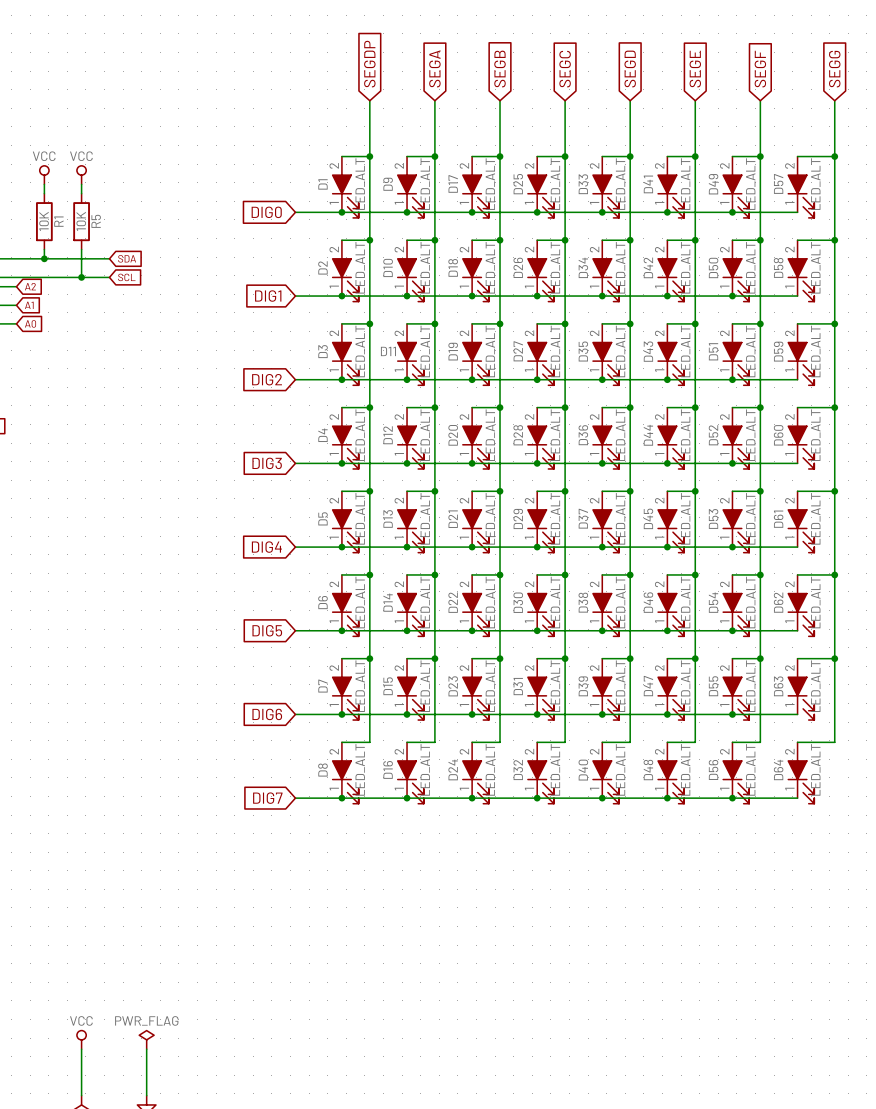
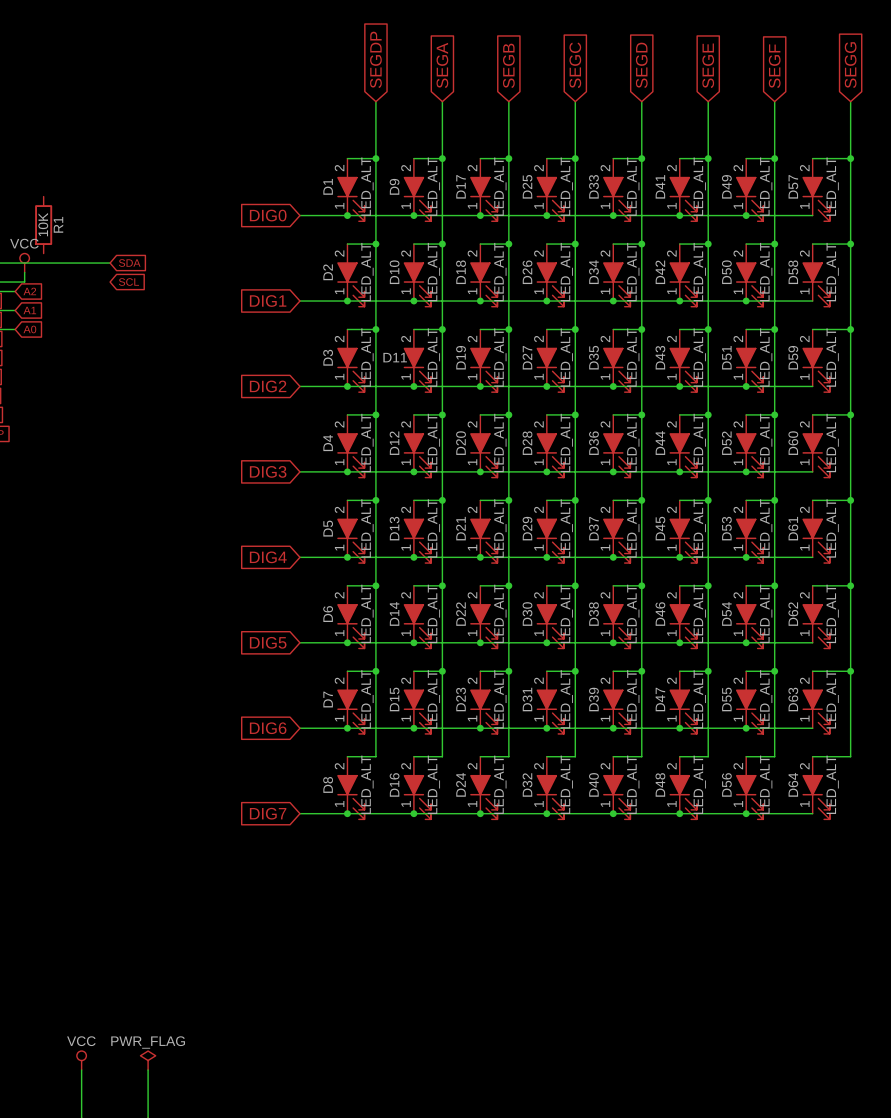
power symbol: VCC (44, 175) -> none
power symbol: VCC (81, 175) -> none
wire: (44, 184) (44, 193) -> none
wire: (81, 184) (81, 193) -> none
R5: 10K (81, 221) -> none
wire: (44, 249) (44, 258) -> none
wire: (81, 249) (81, 277) -> none
power symbol: none -> VCC (24, 263)
junction: (44, 258) -> none
wire: (25, 277) (109, 277) -> (24, 282) (24, 272)
junction: (81, 277) -> none

